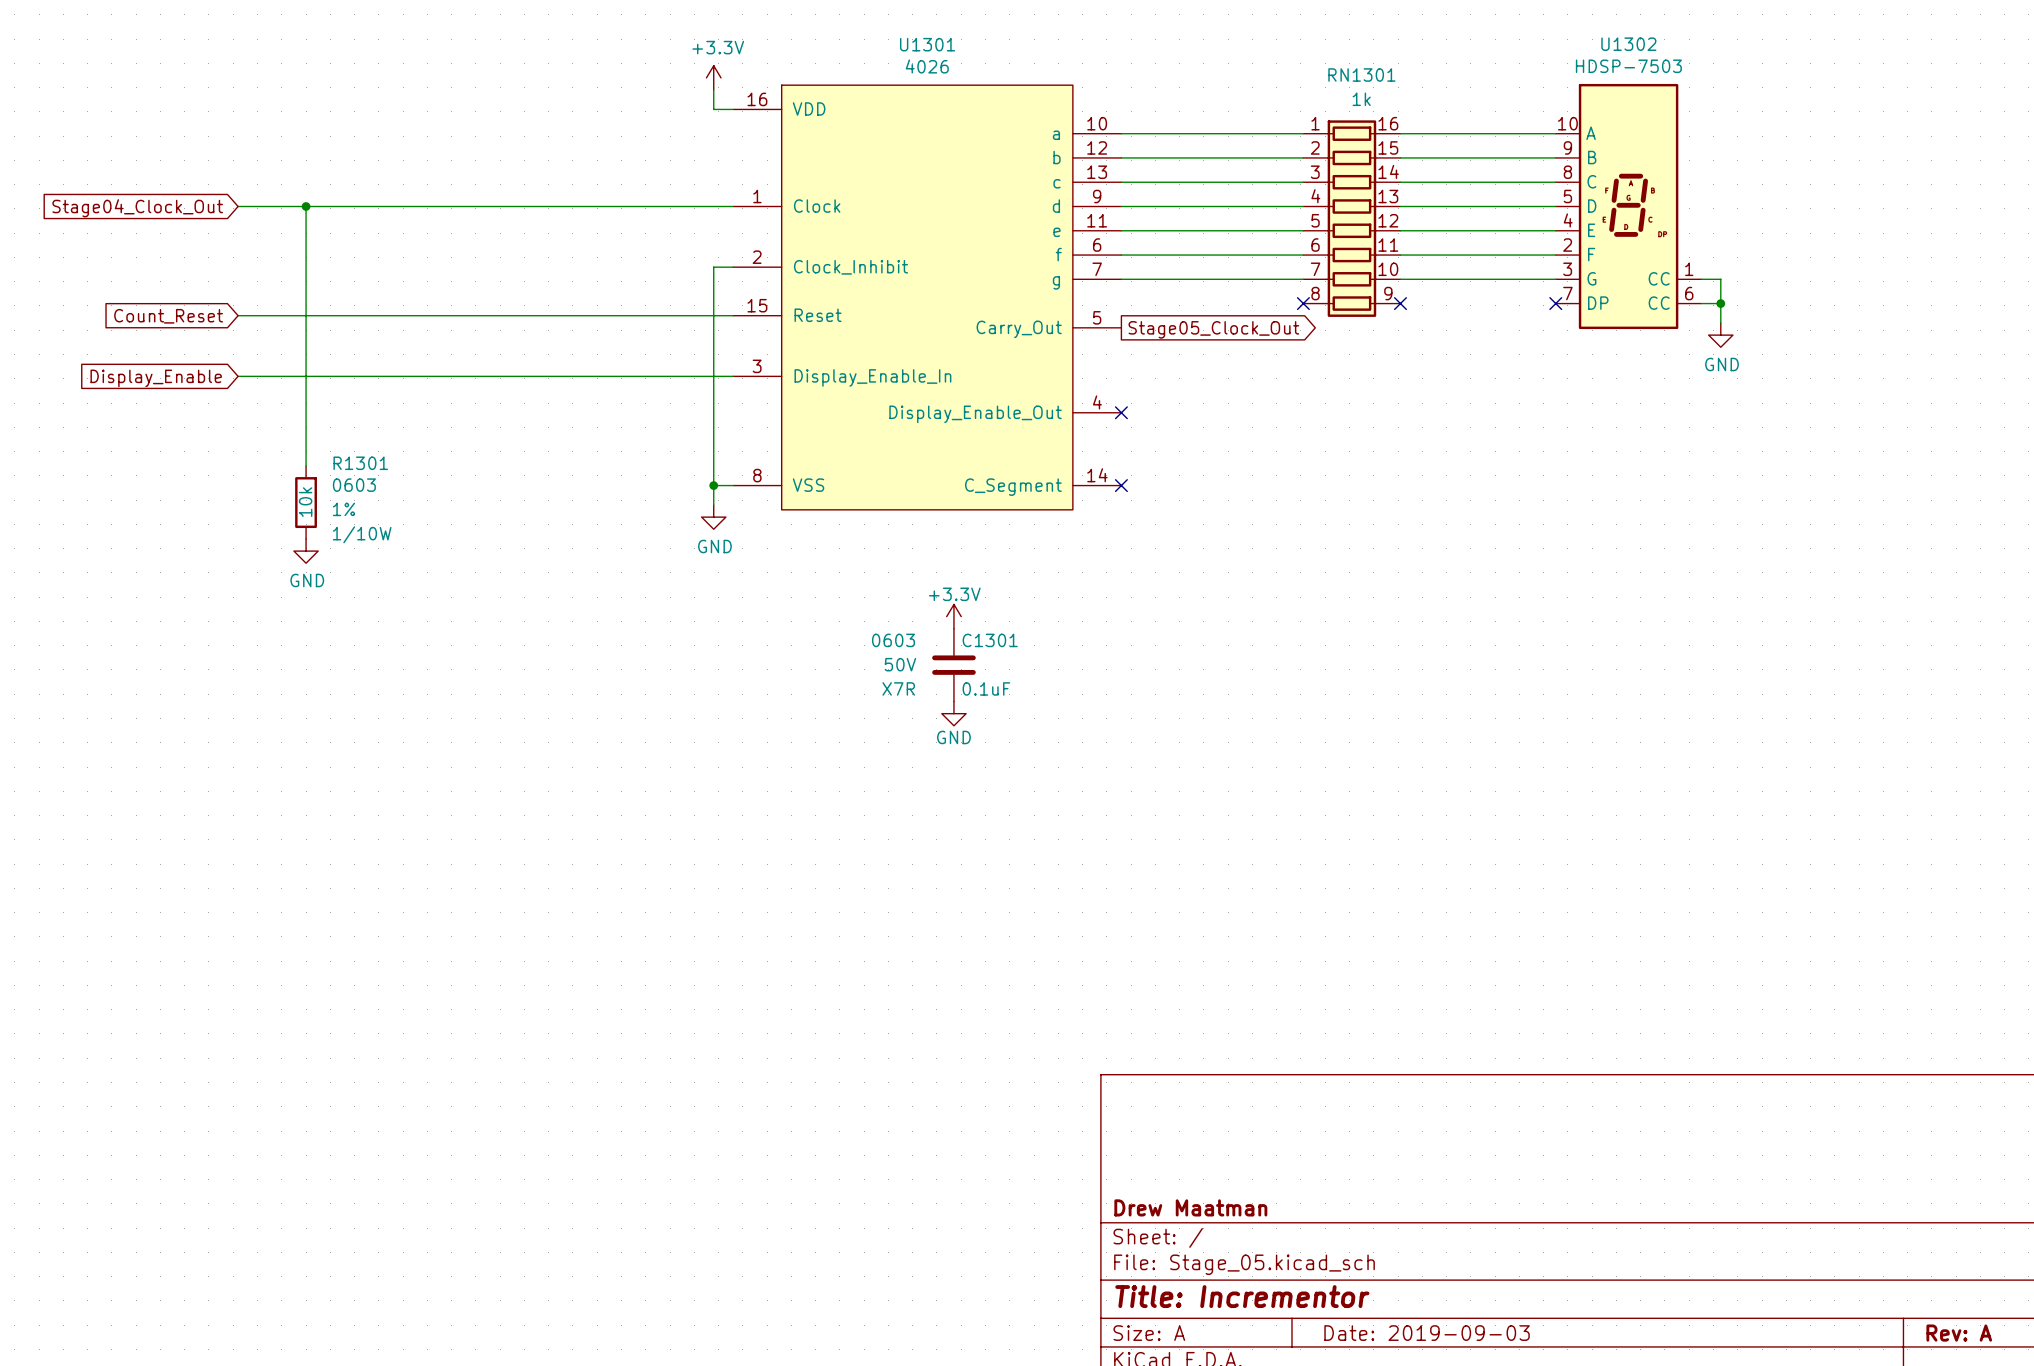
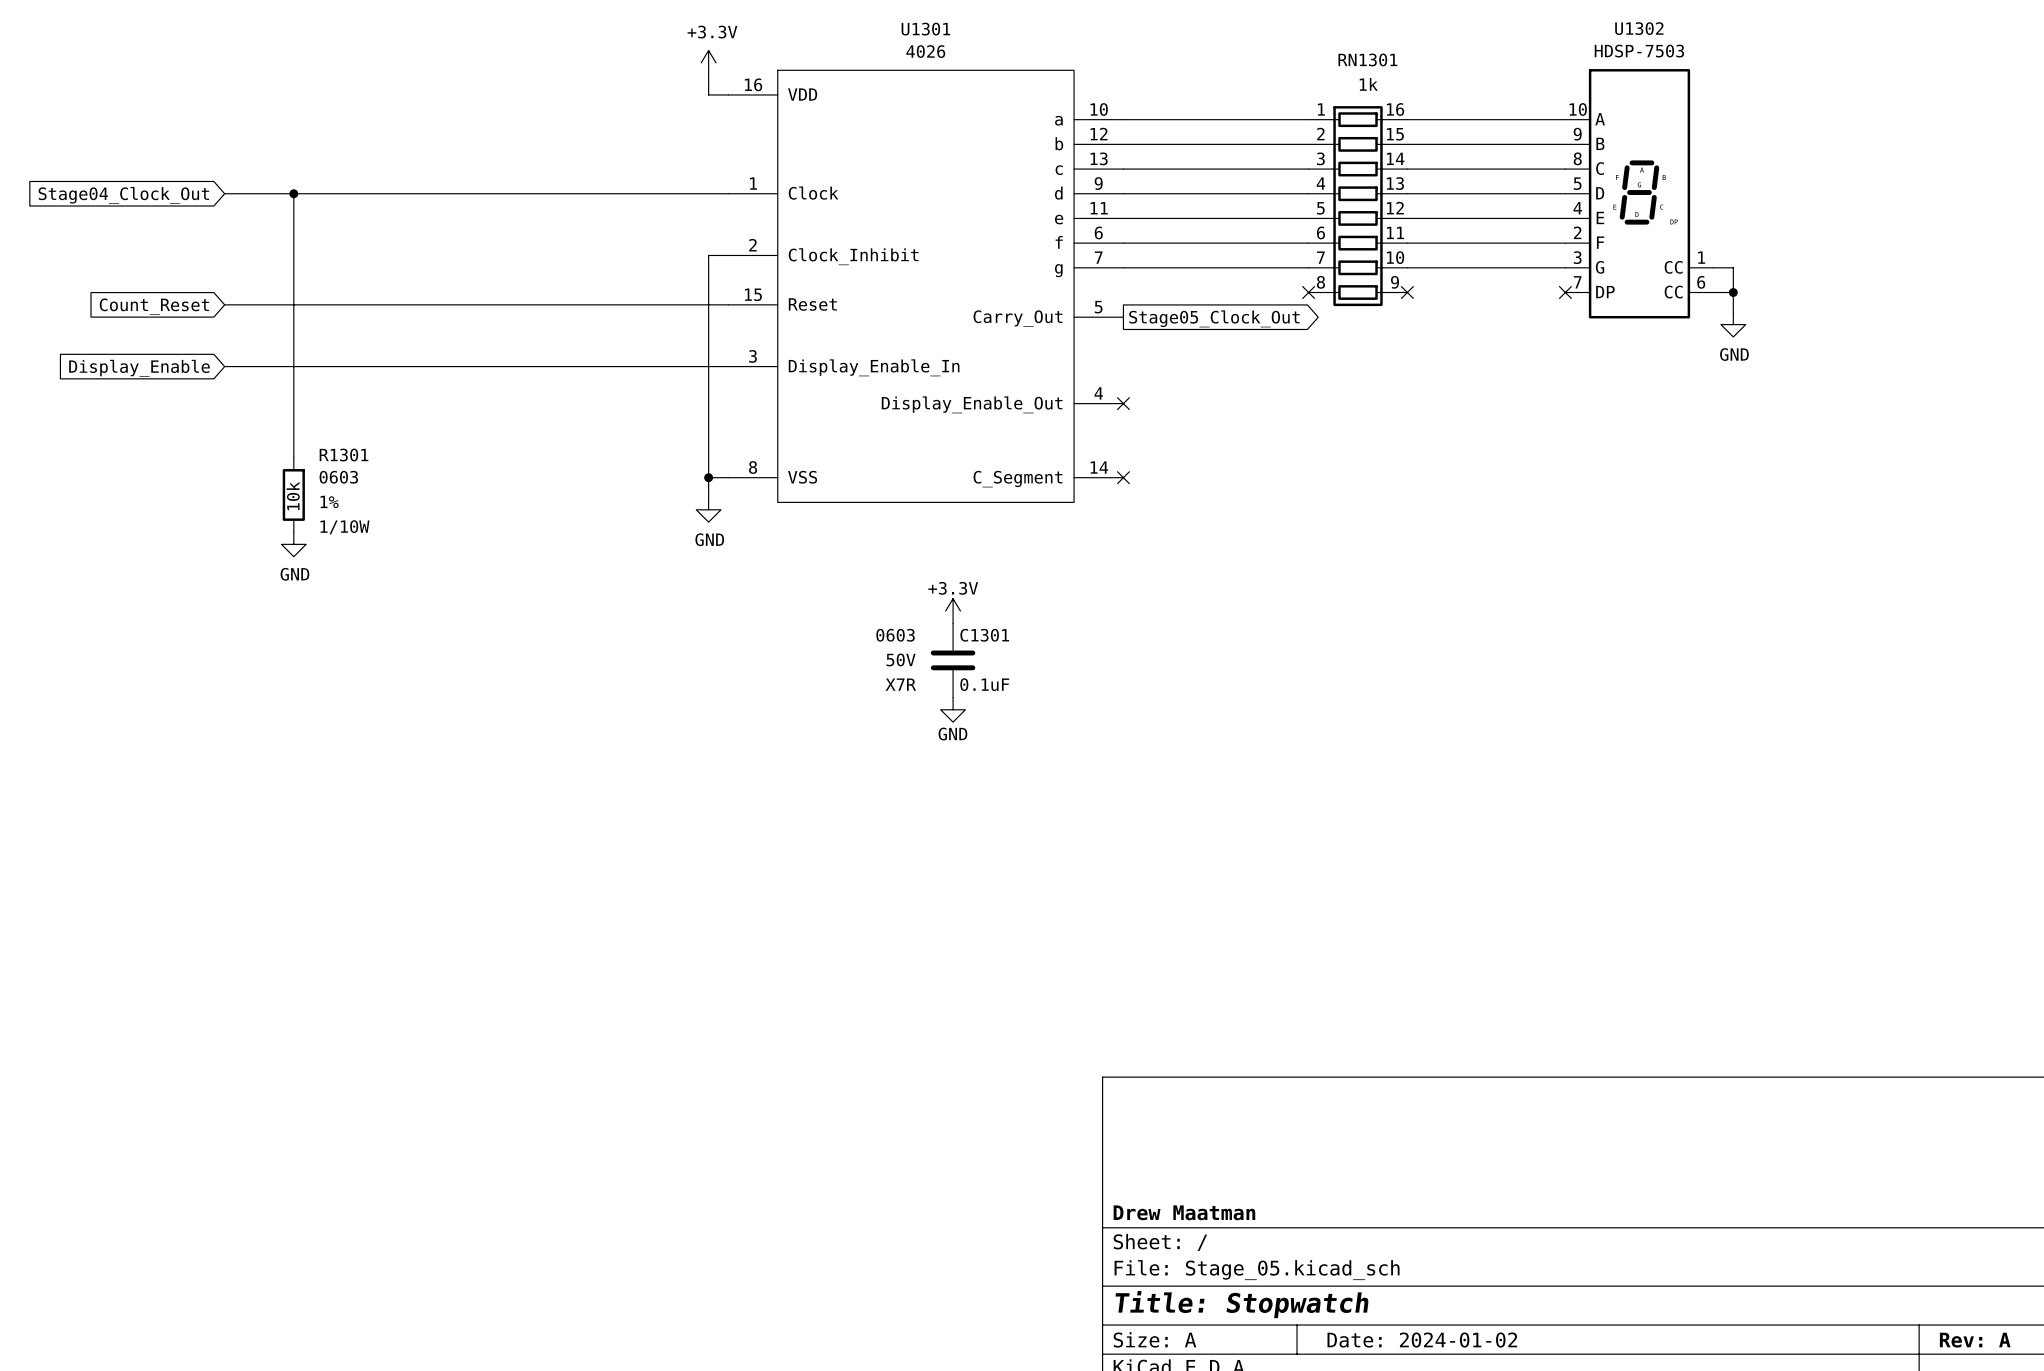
title block: Title: Incrementor (1242, 1296) -> Title: Stopwatch (1242, 1304)
title block: Date: 2019-09-03 (1427, 1333) -> Date: 2024-01-02 (1422, 1340)

